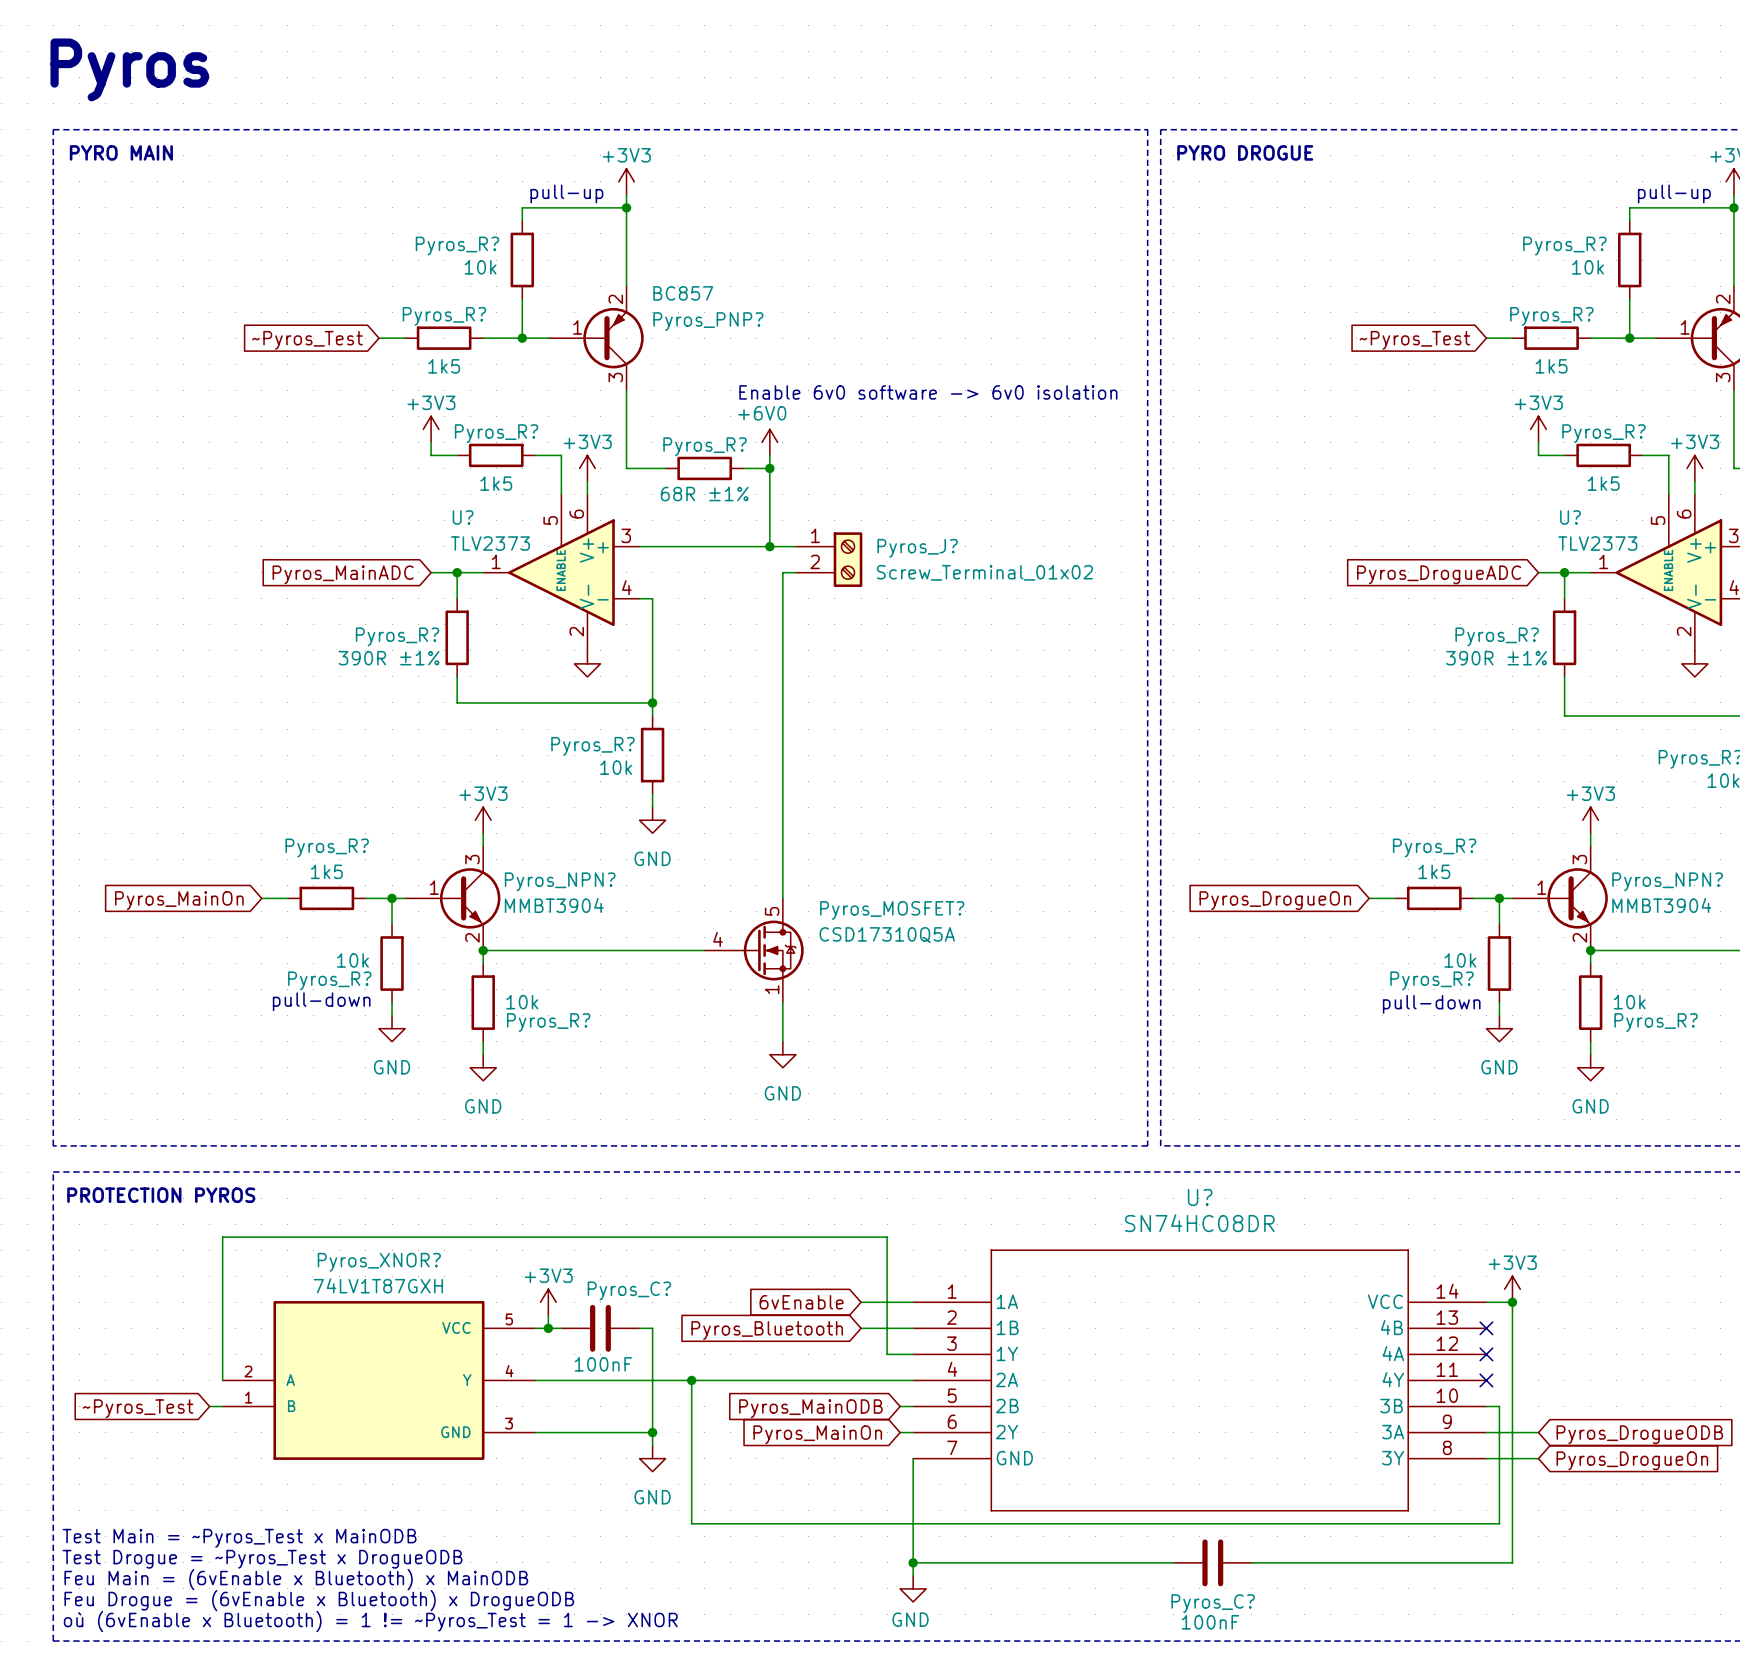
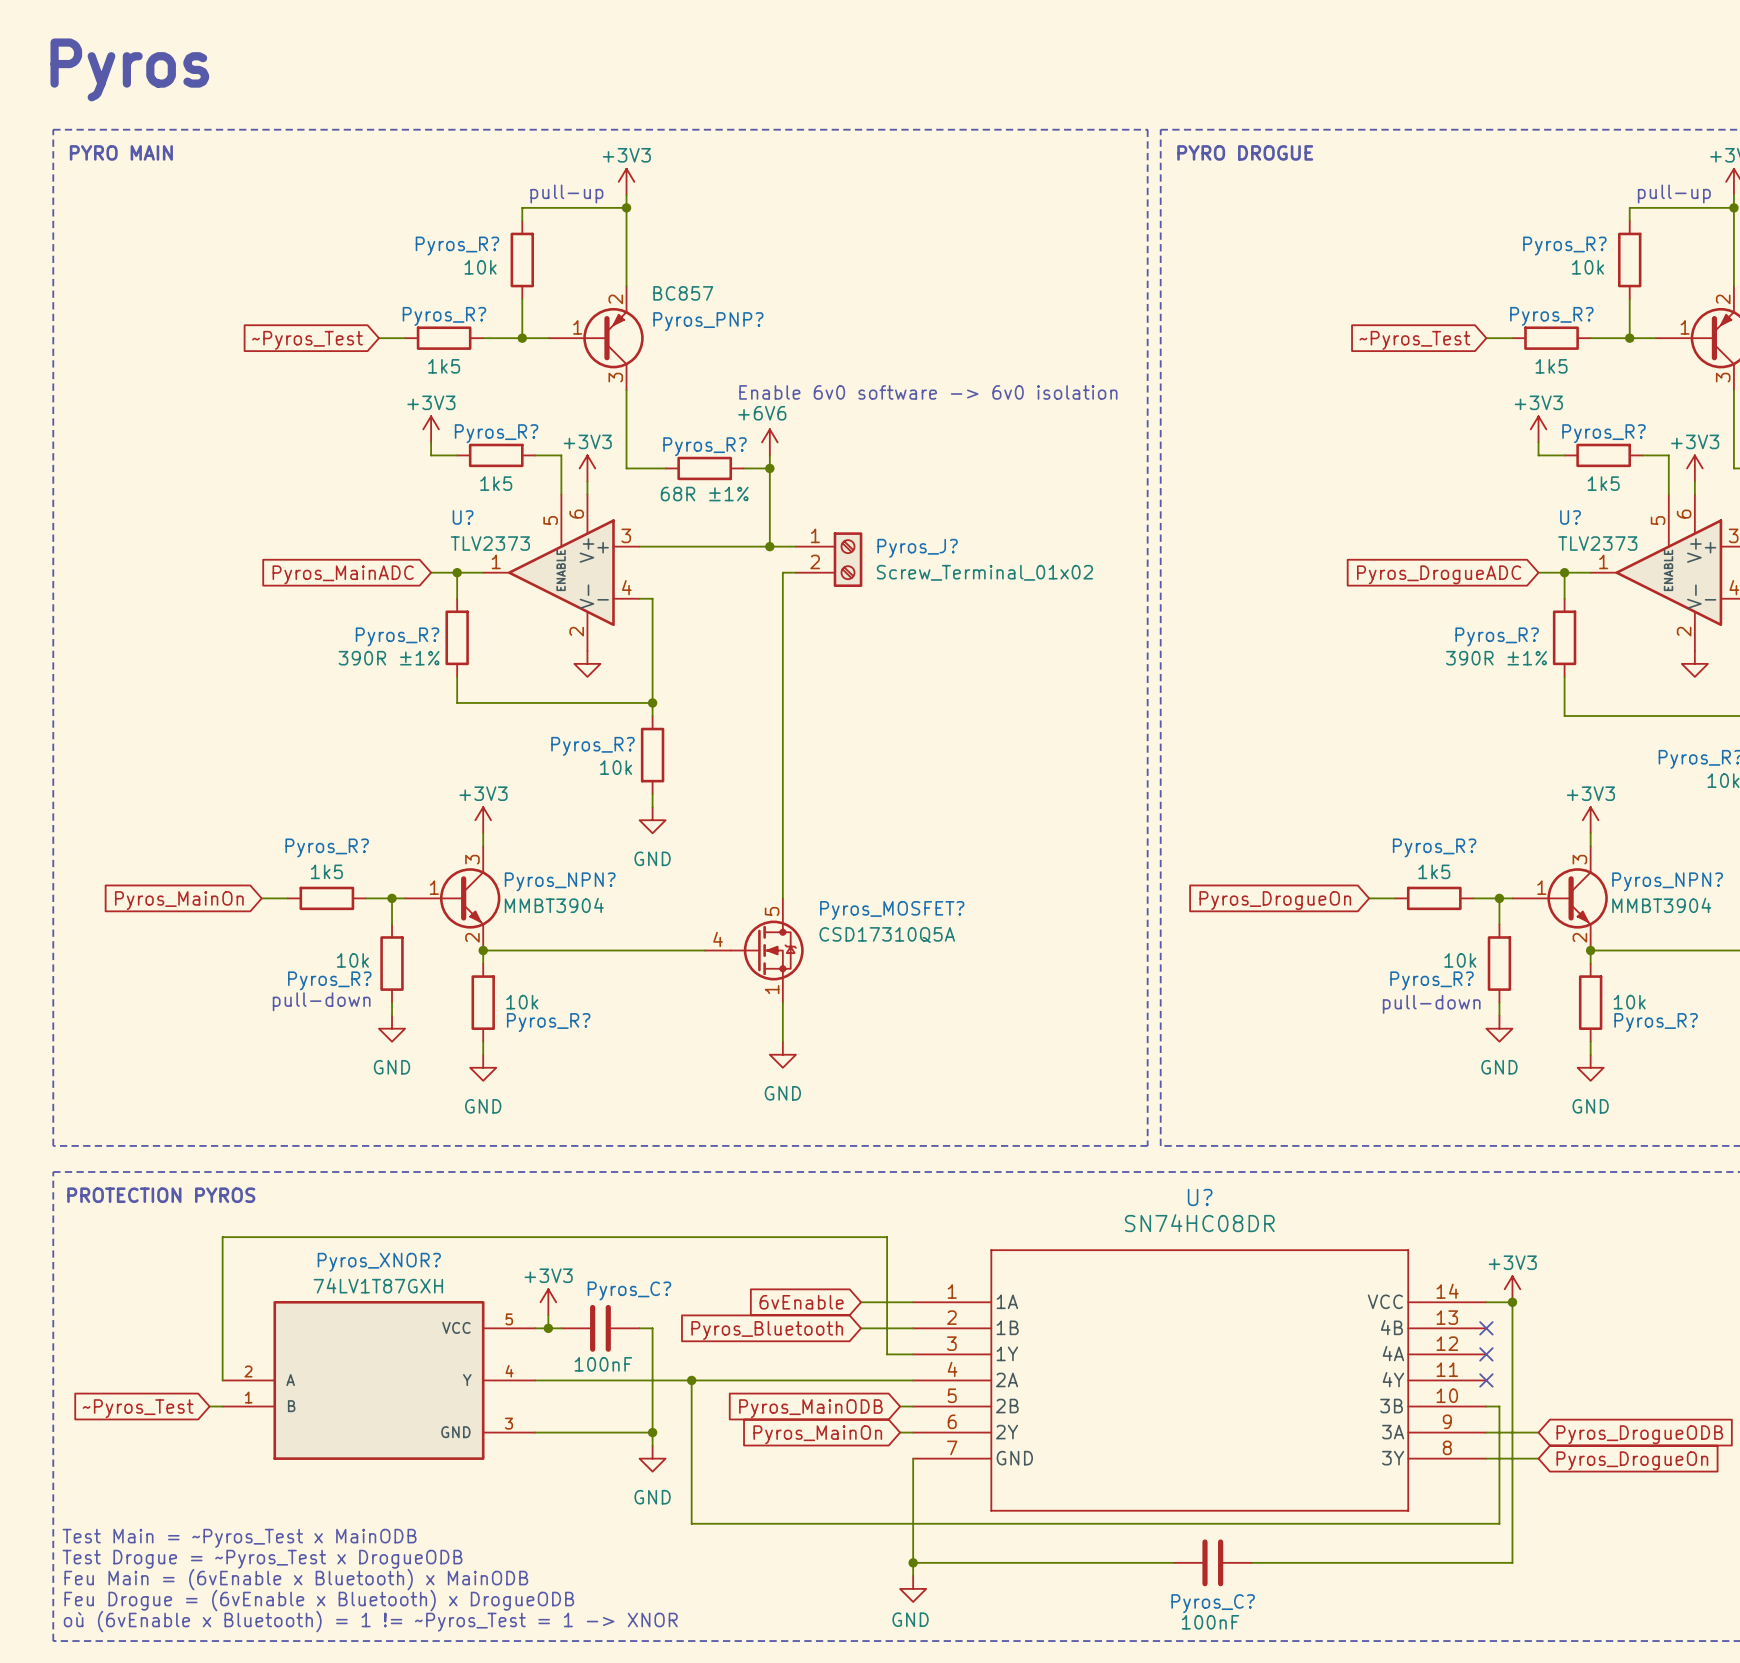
power symbol: +6V0 (769, 442) -> +6V6 (769, 442)

